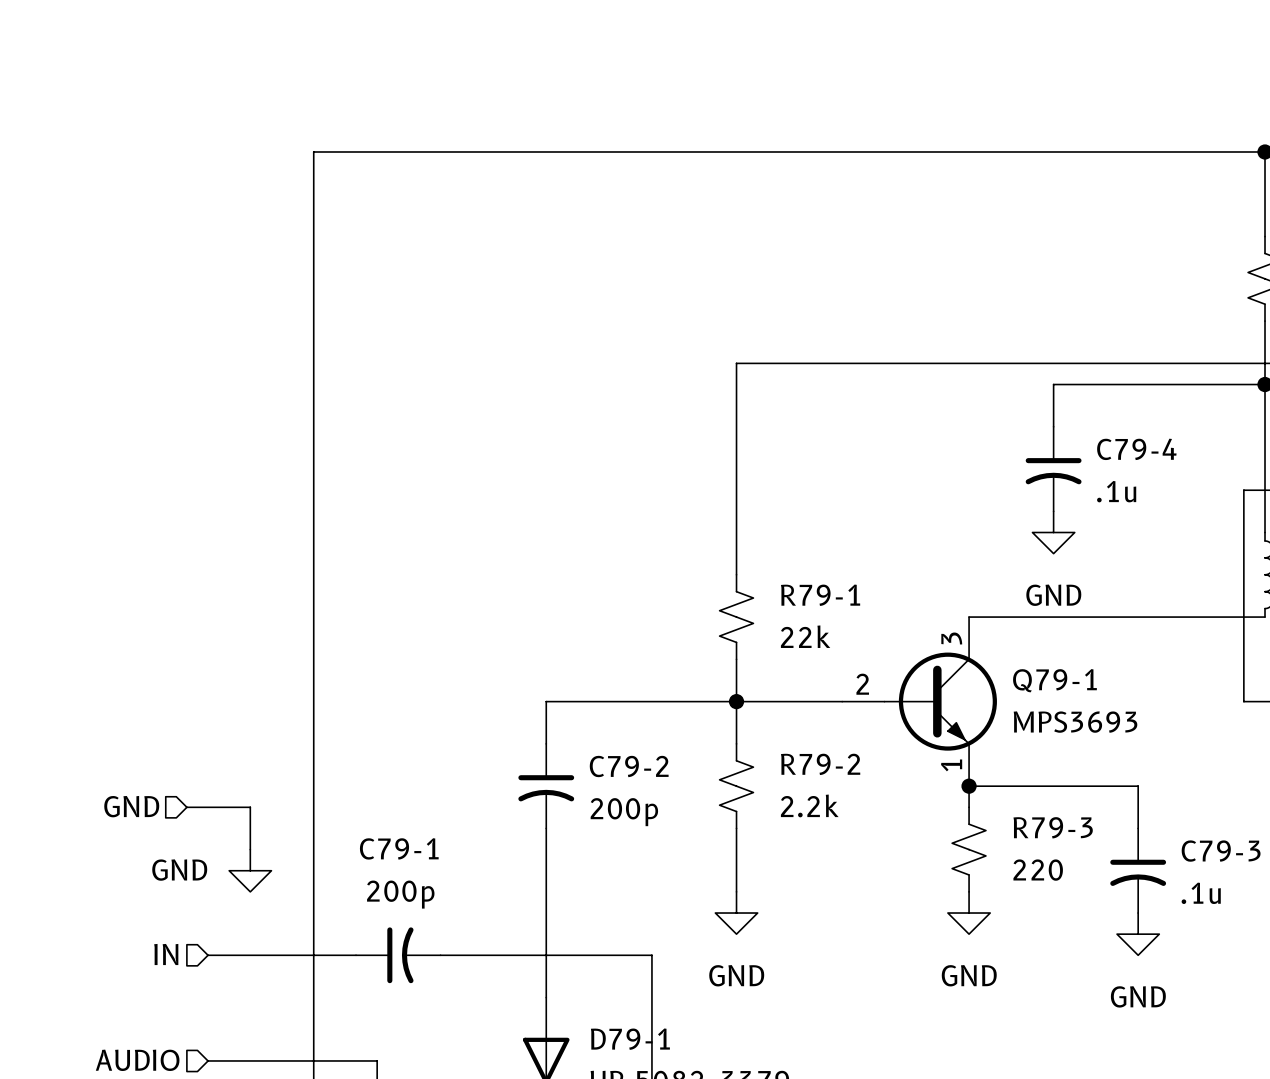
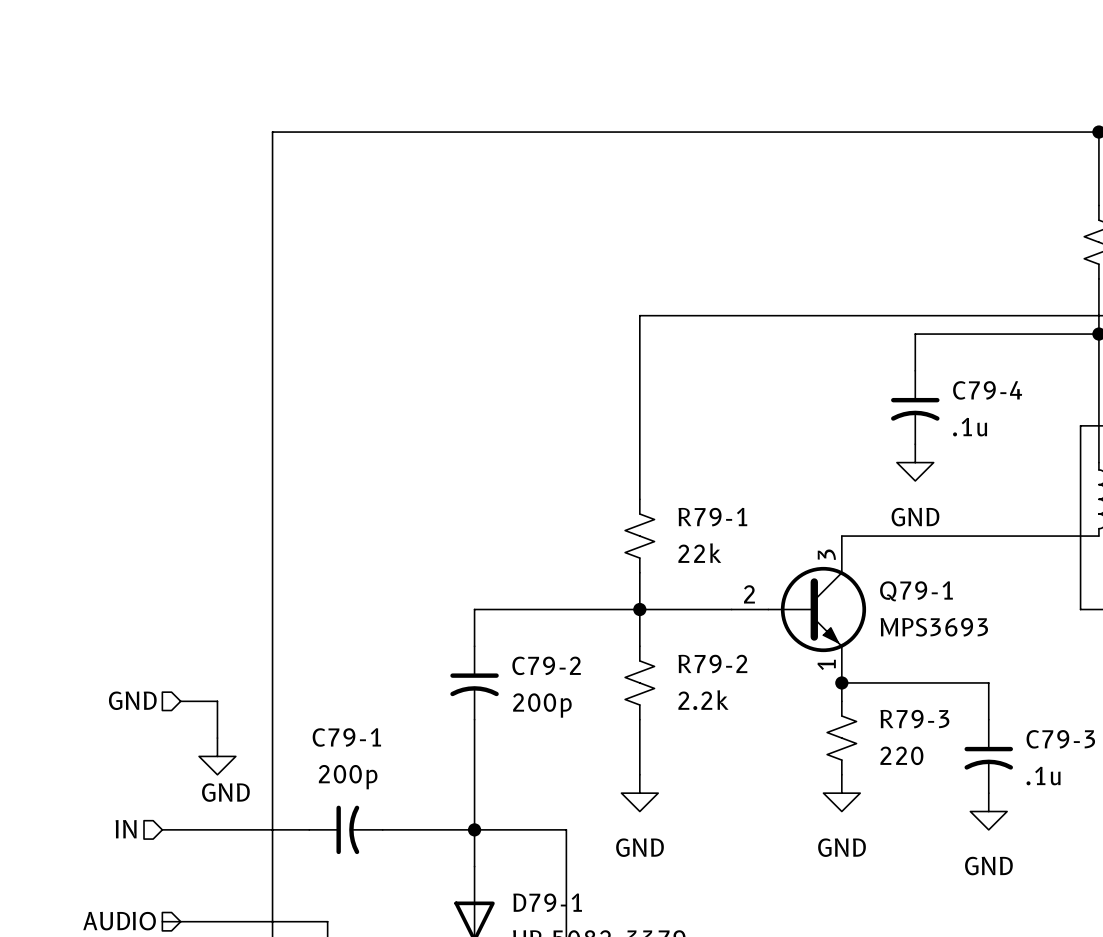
hierarchical label position: GND (131, 806) -> GND (132, 700)
wire: (186, 807) (208, 807) -> (162, 829) (180, 829)
power symbol text position: GND (179, 870) -> GND (225, 792)
hierarchical label position: IN (166, 954) -> IN (126, 829)
junction: none -> (474, 829)
wire: none -> (162, 921) (180, 921)

